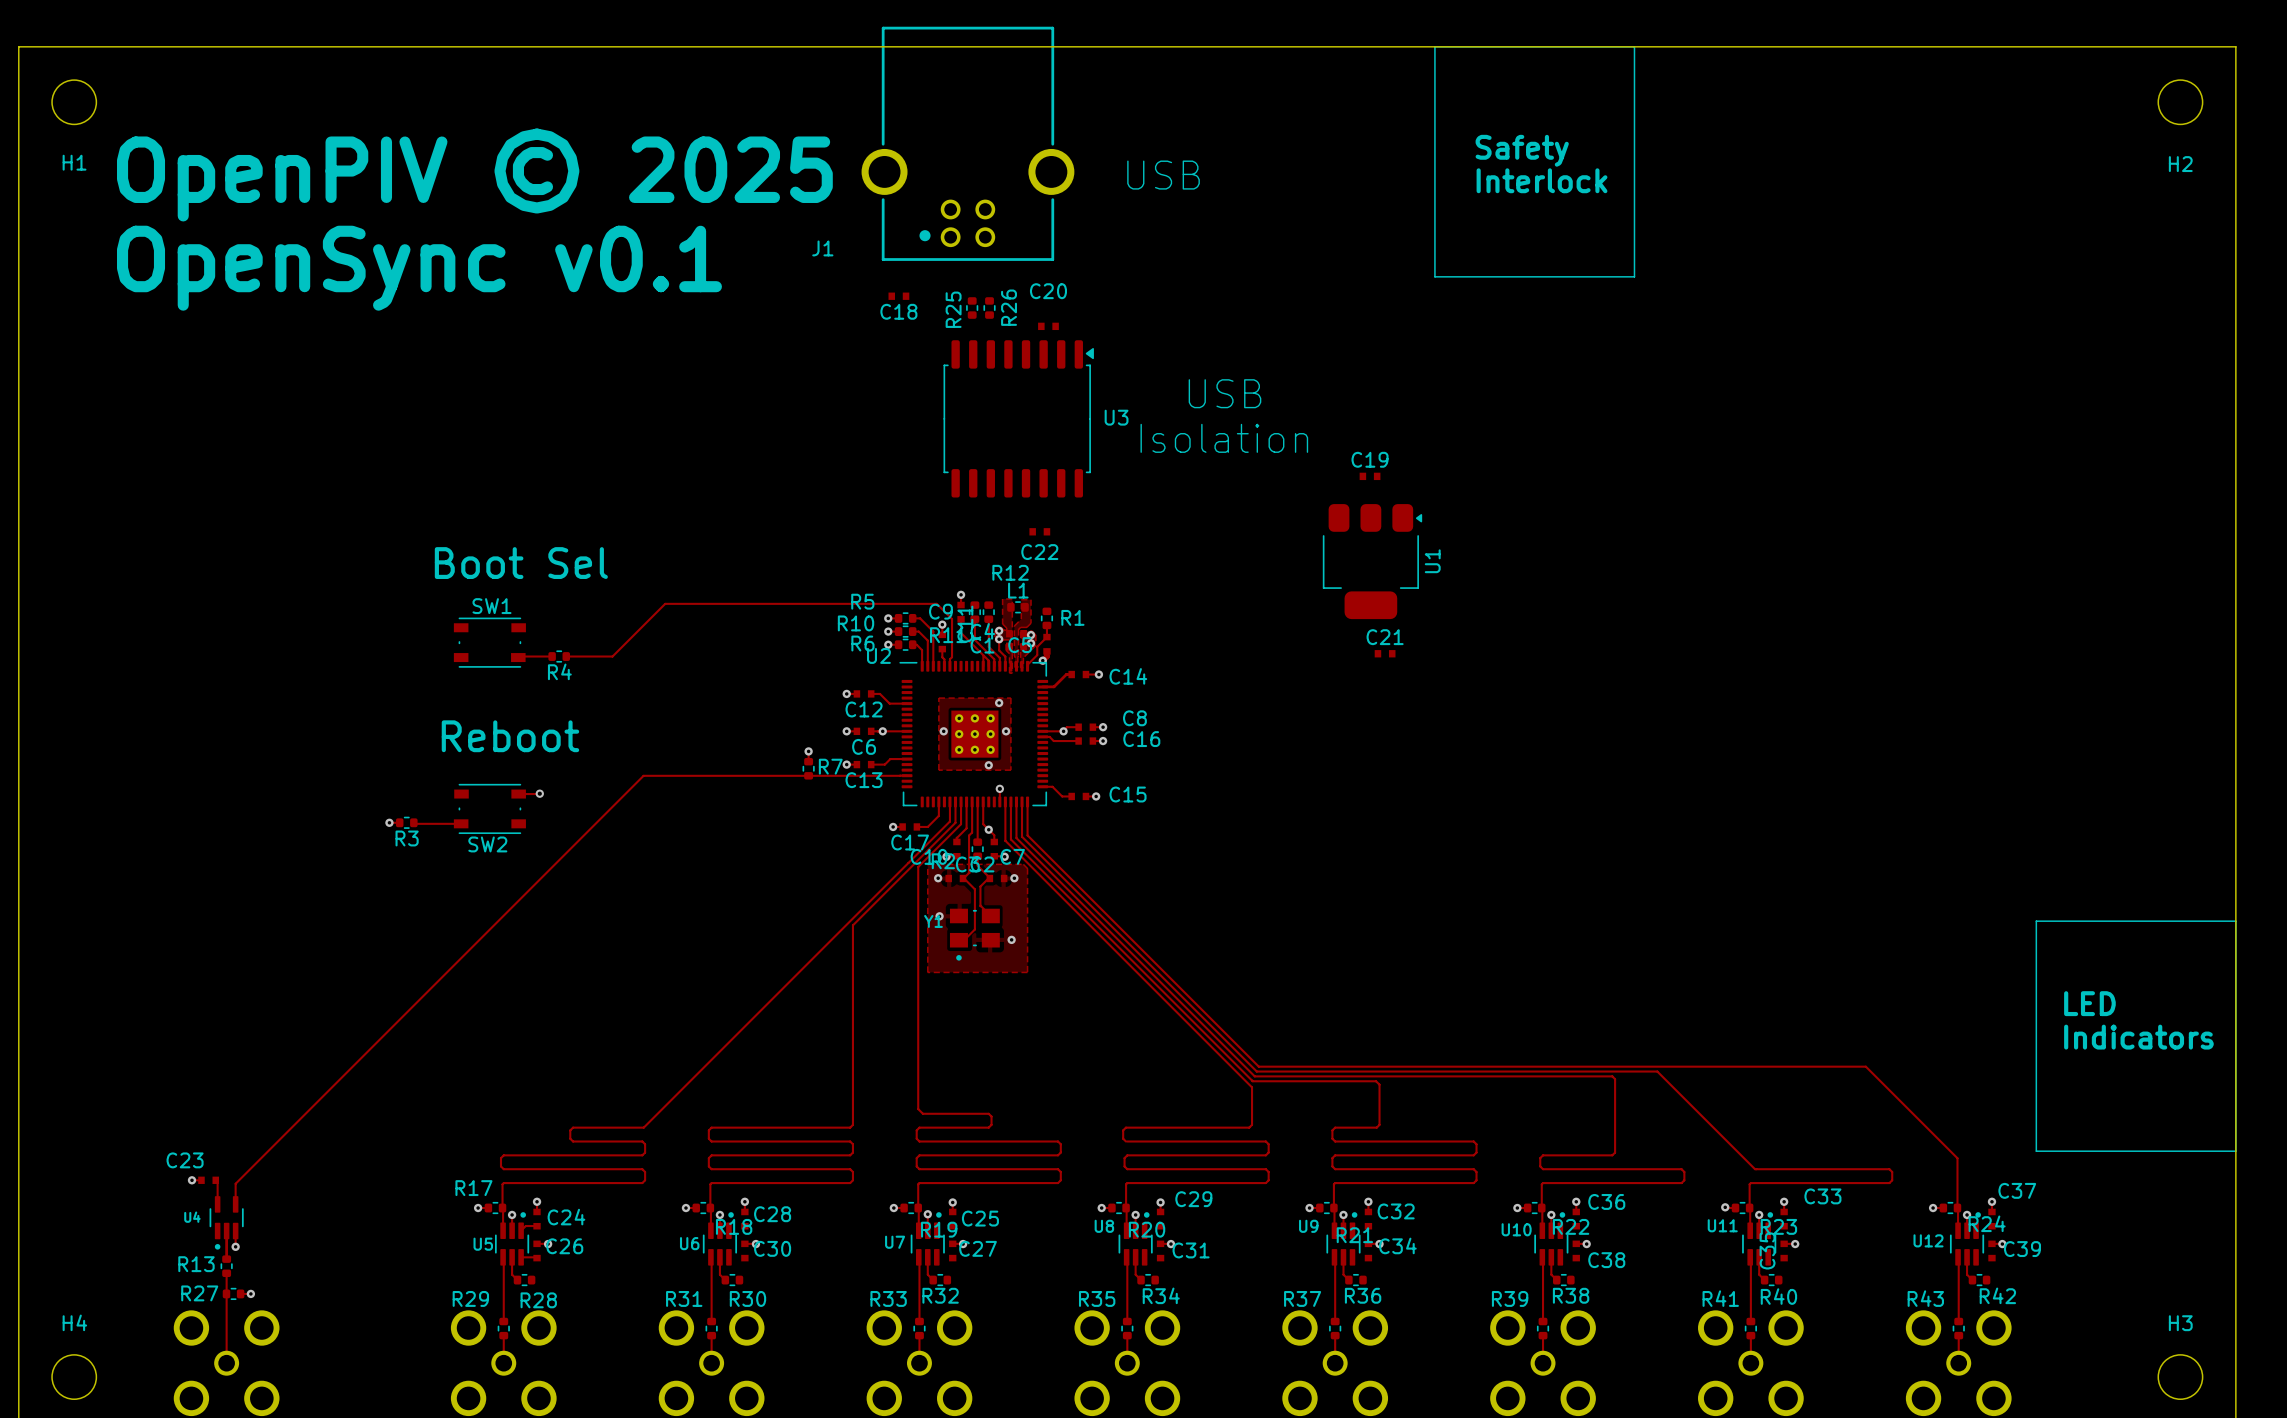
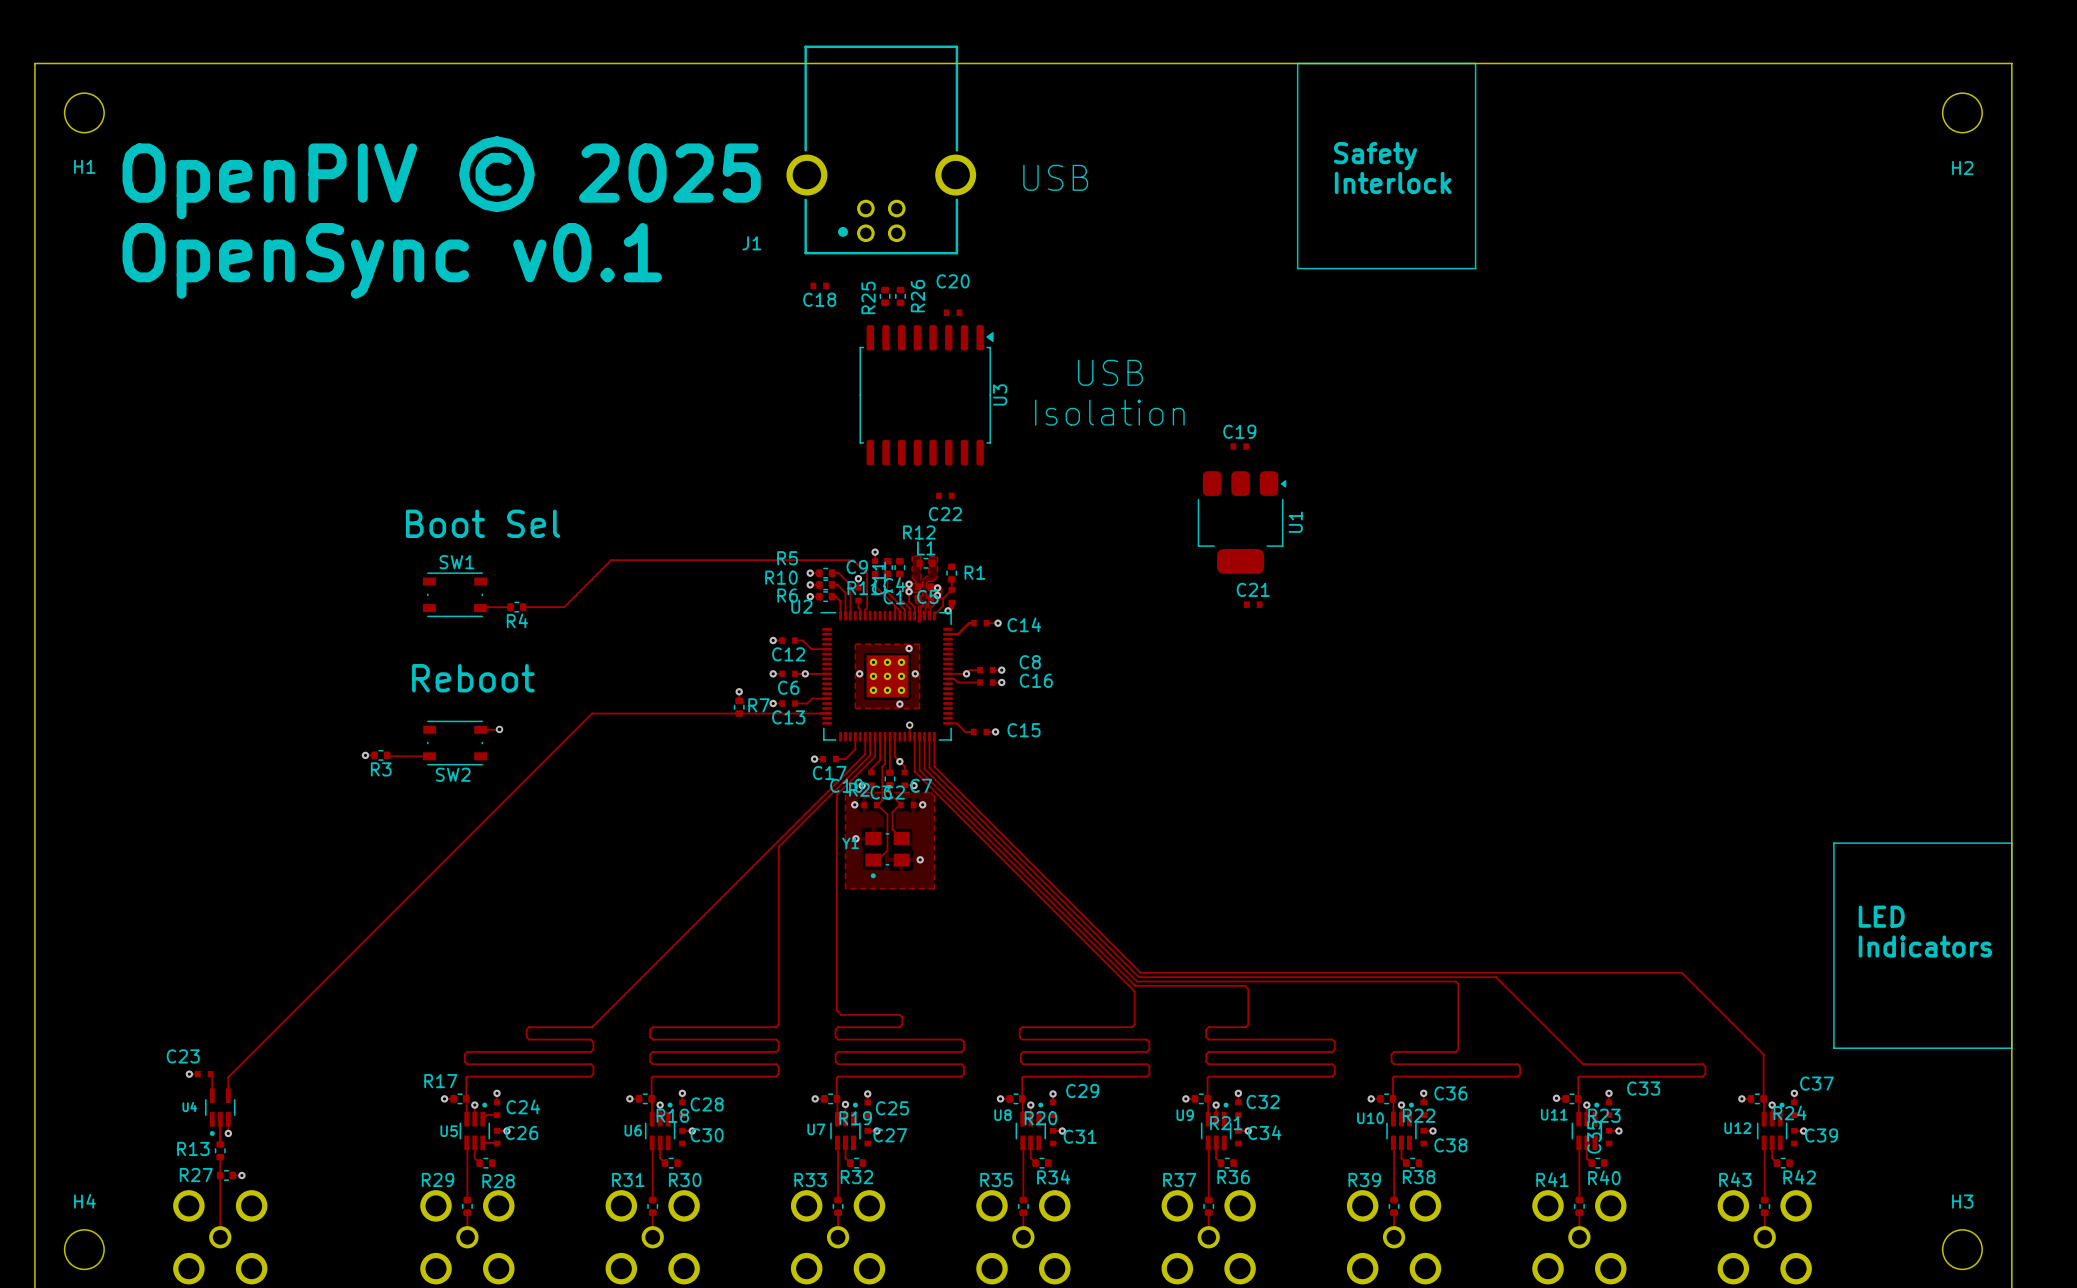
U3 name rotation: 0° (1116, 417) -> 90° counterclockwise (1000, 394)

